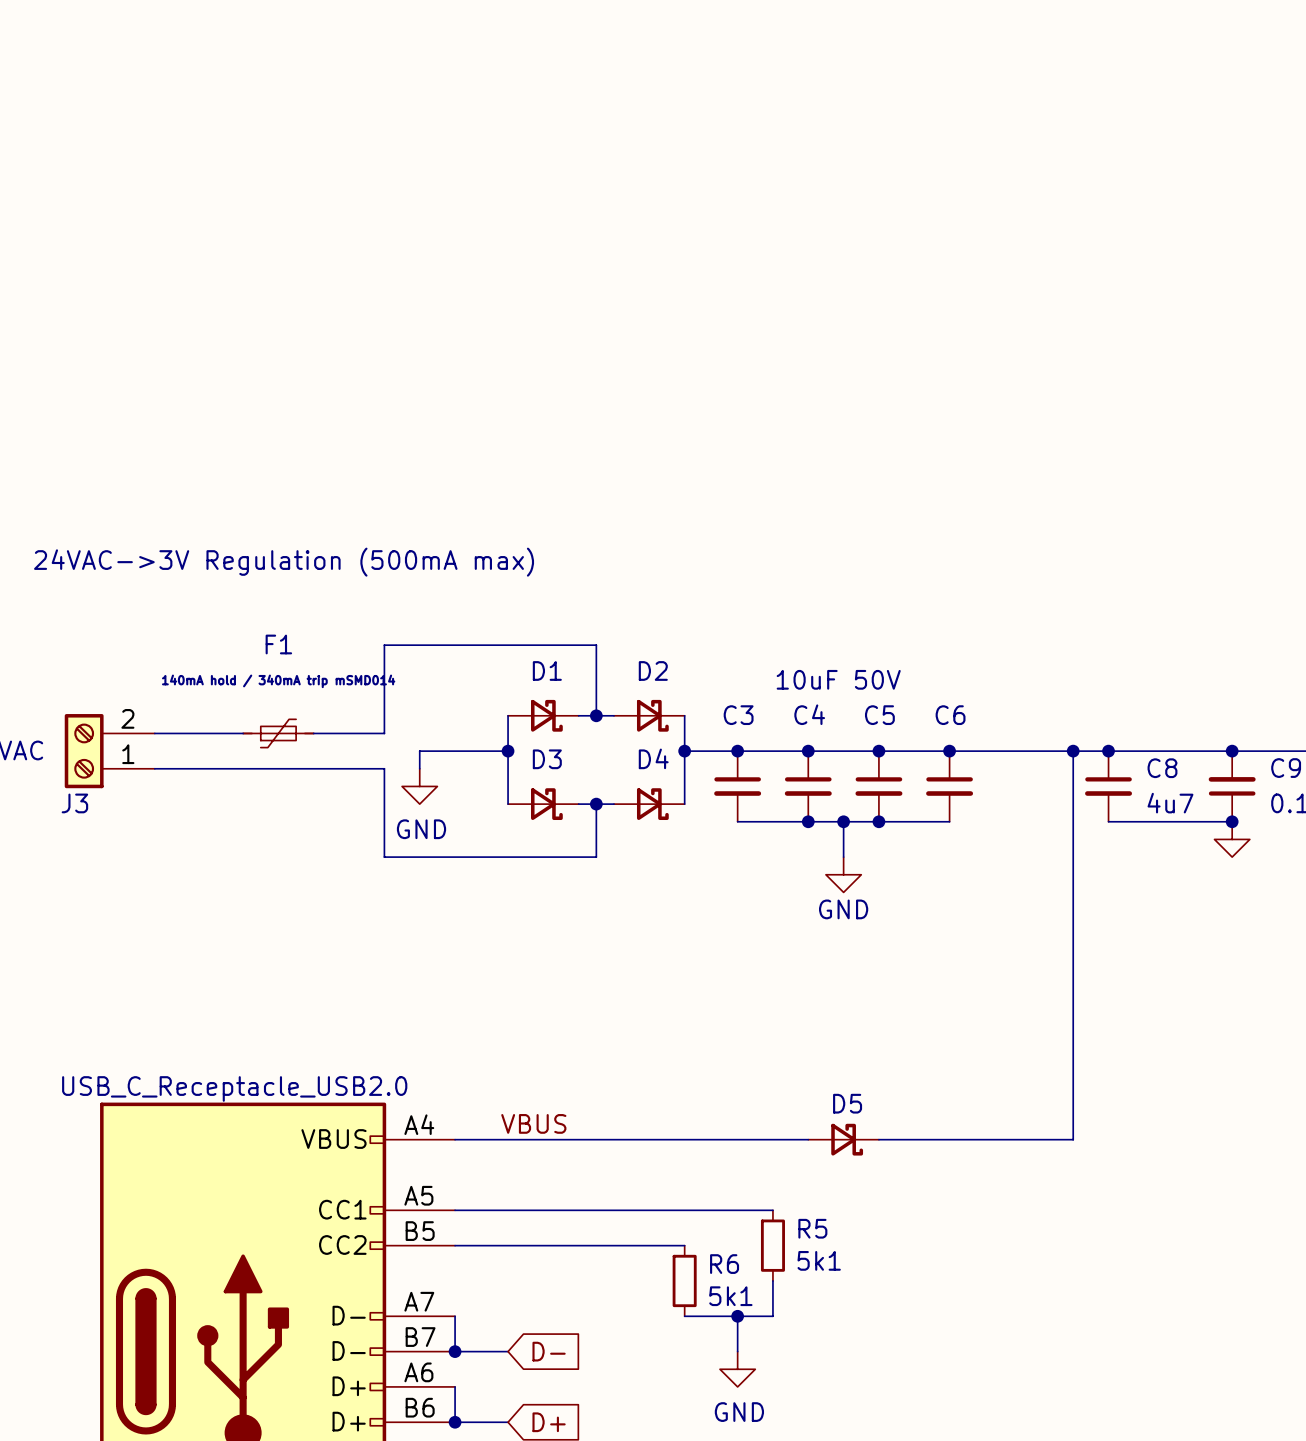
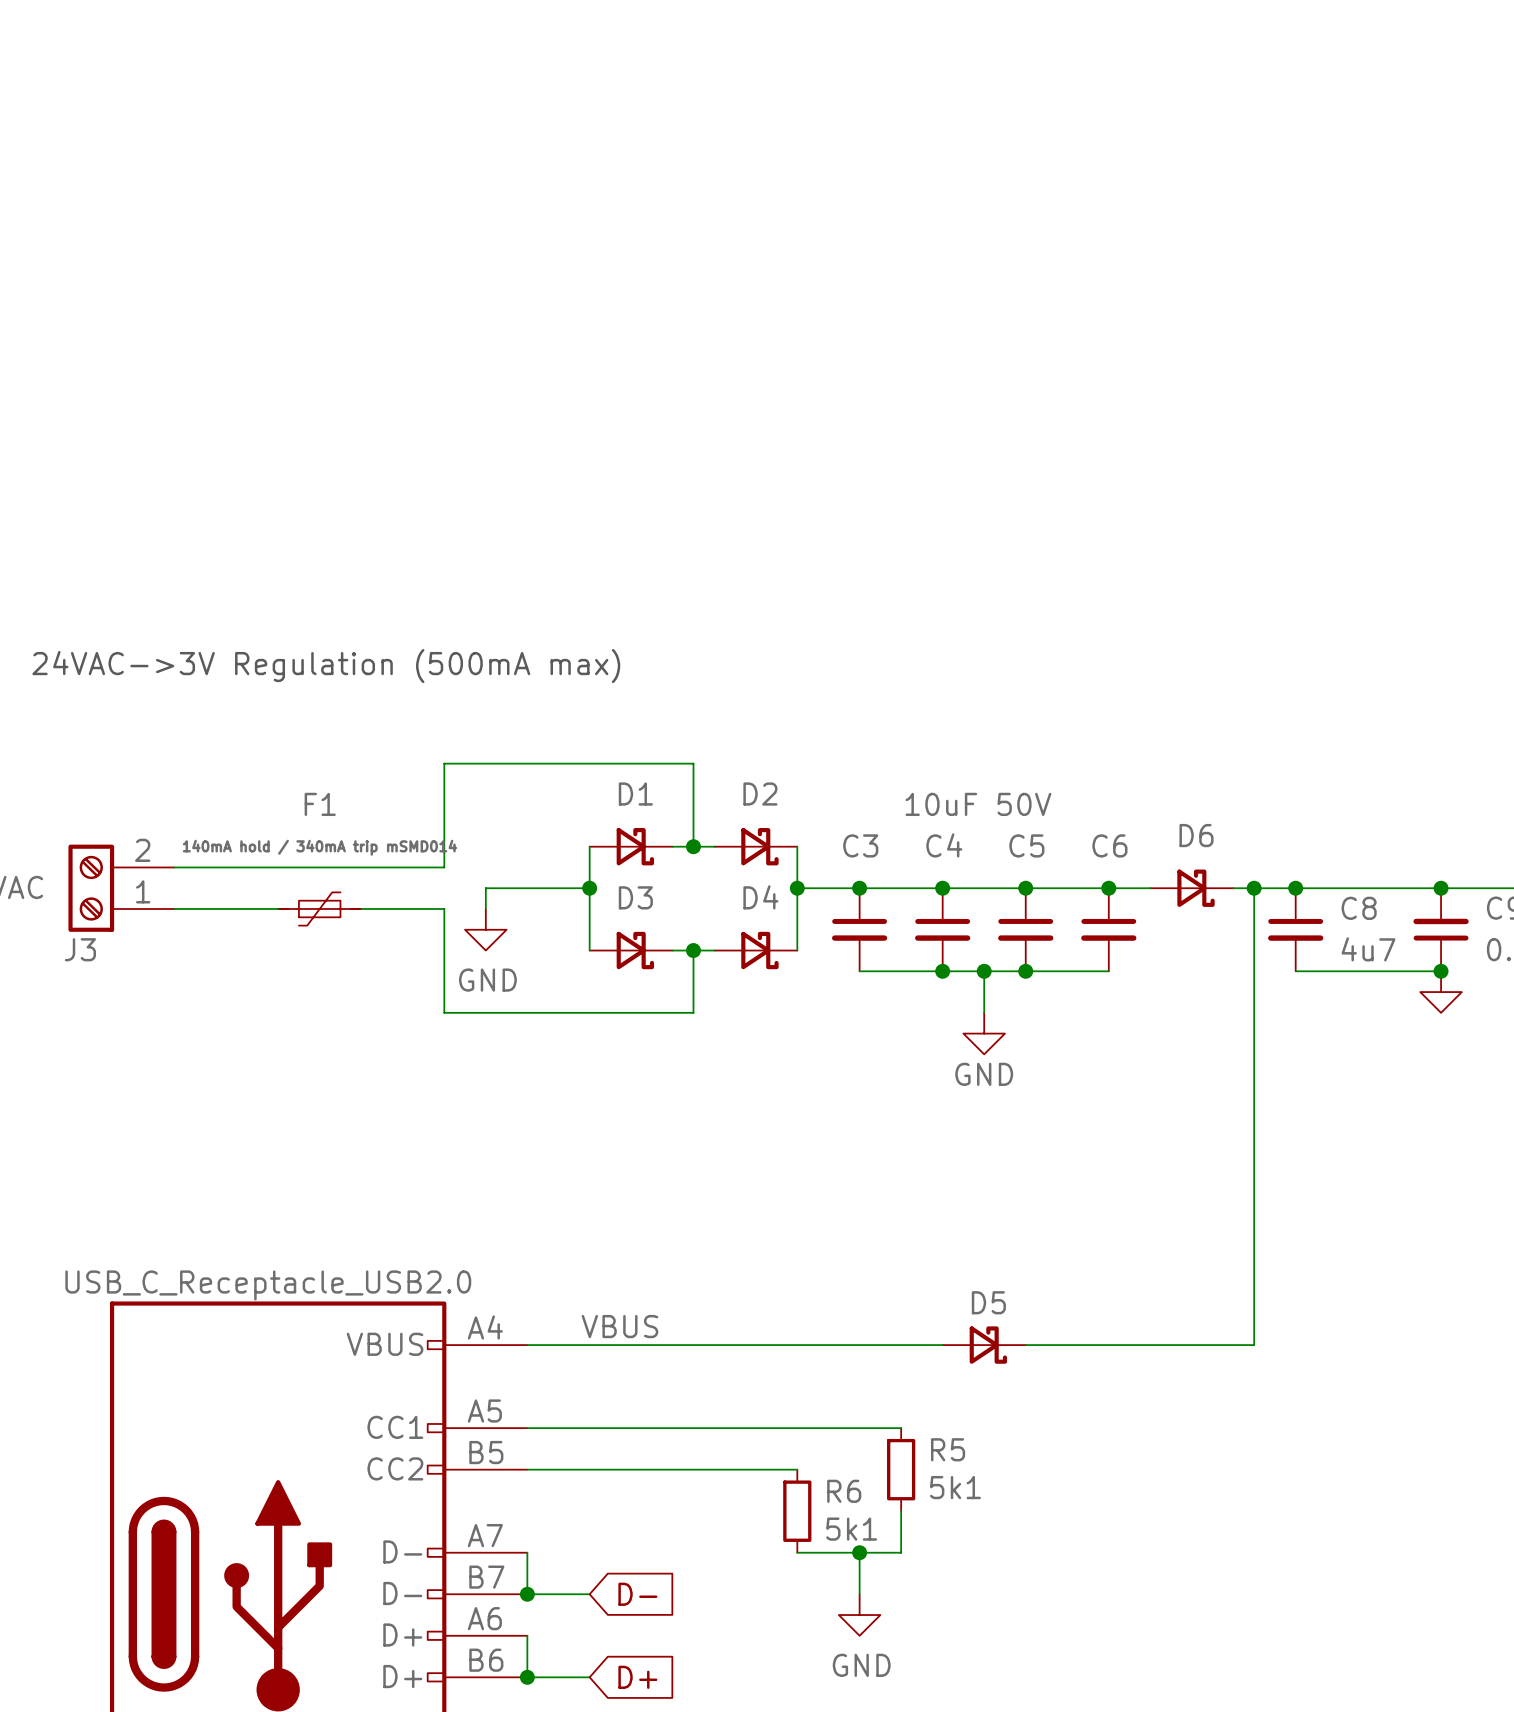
F1 position: (278, 733) -> (319, 909)
D6: none -> (1191, 888)

